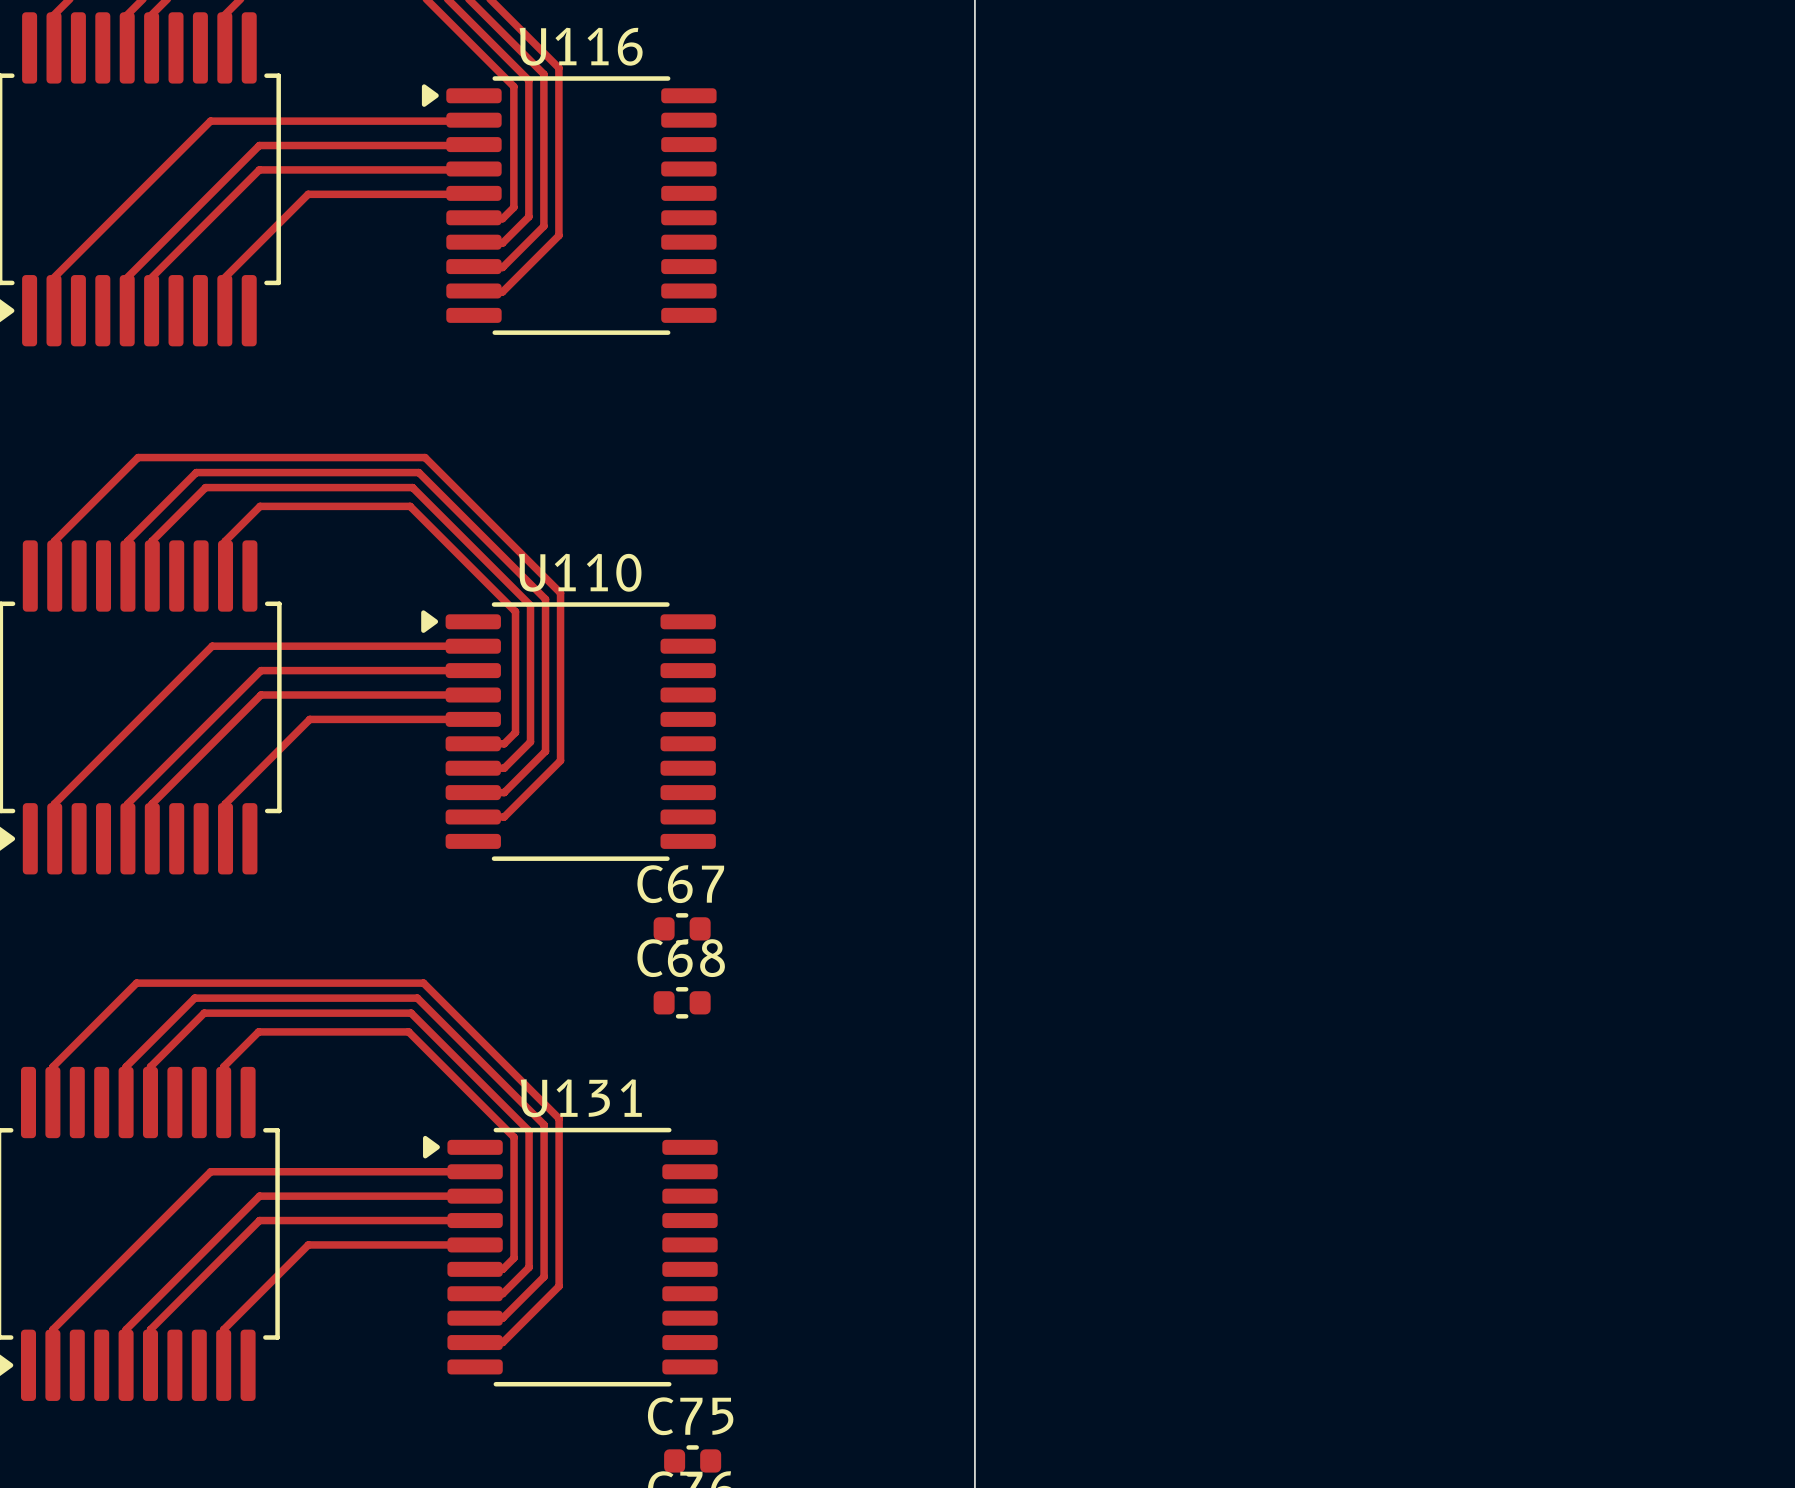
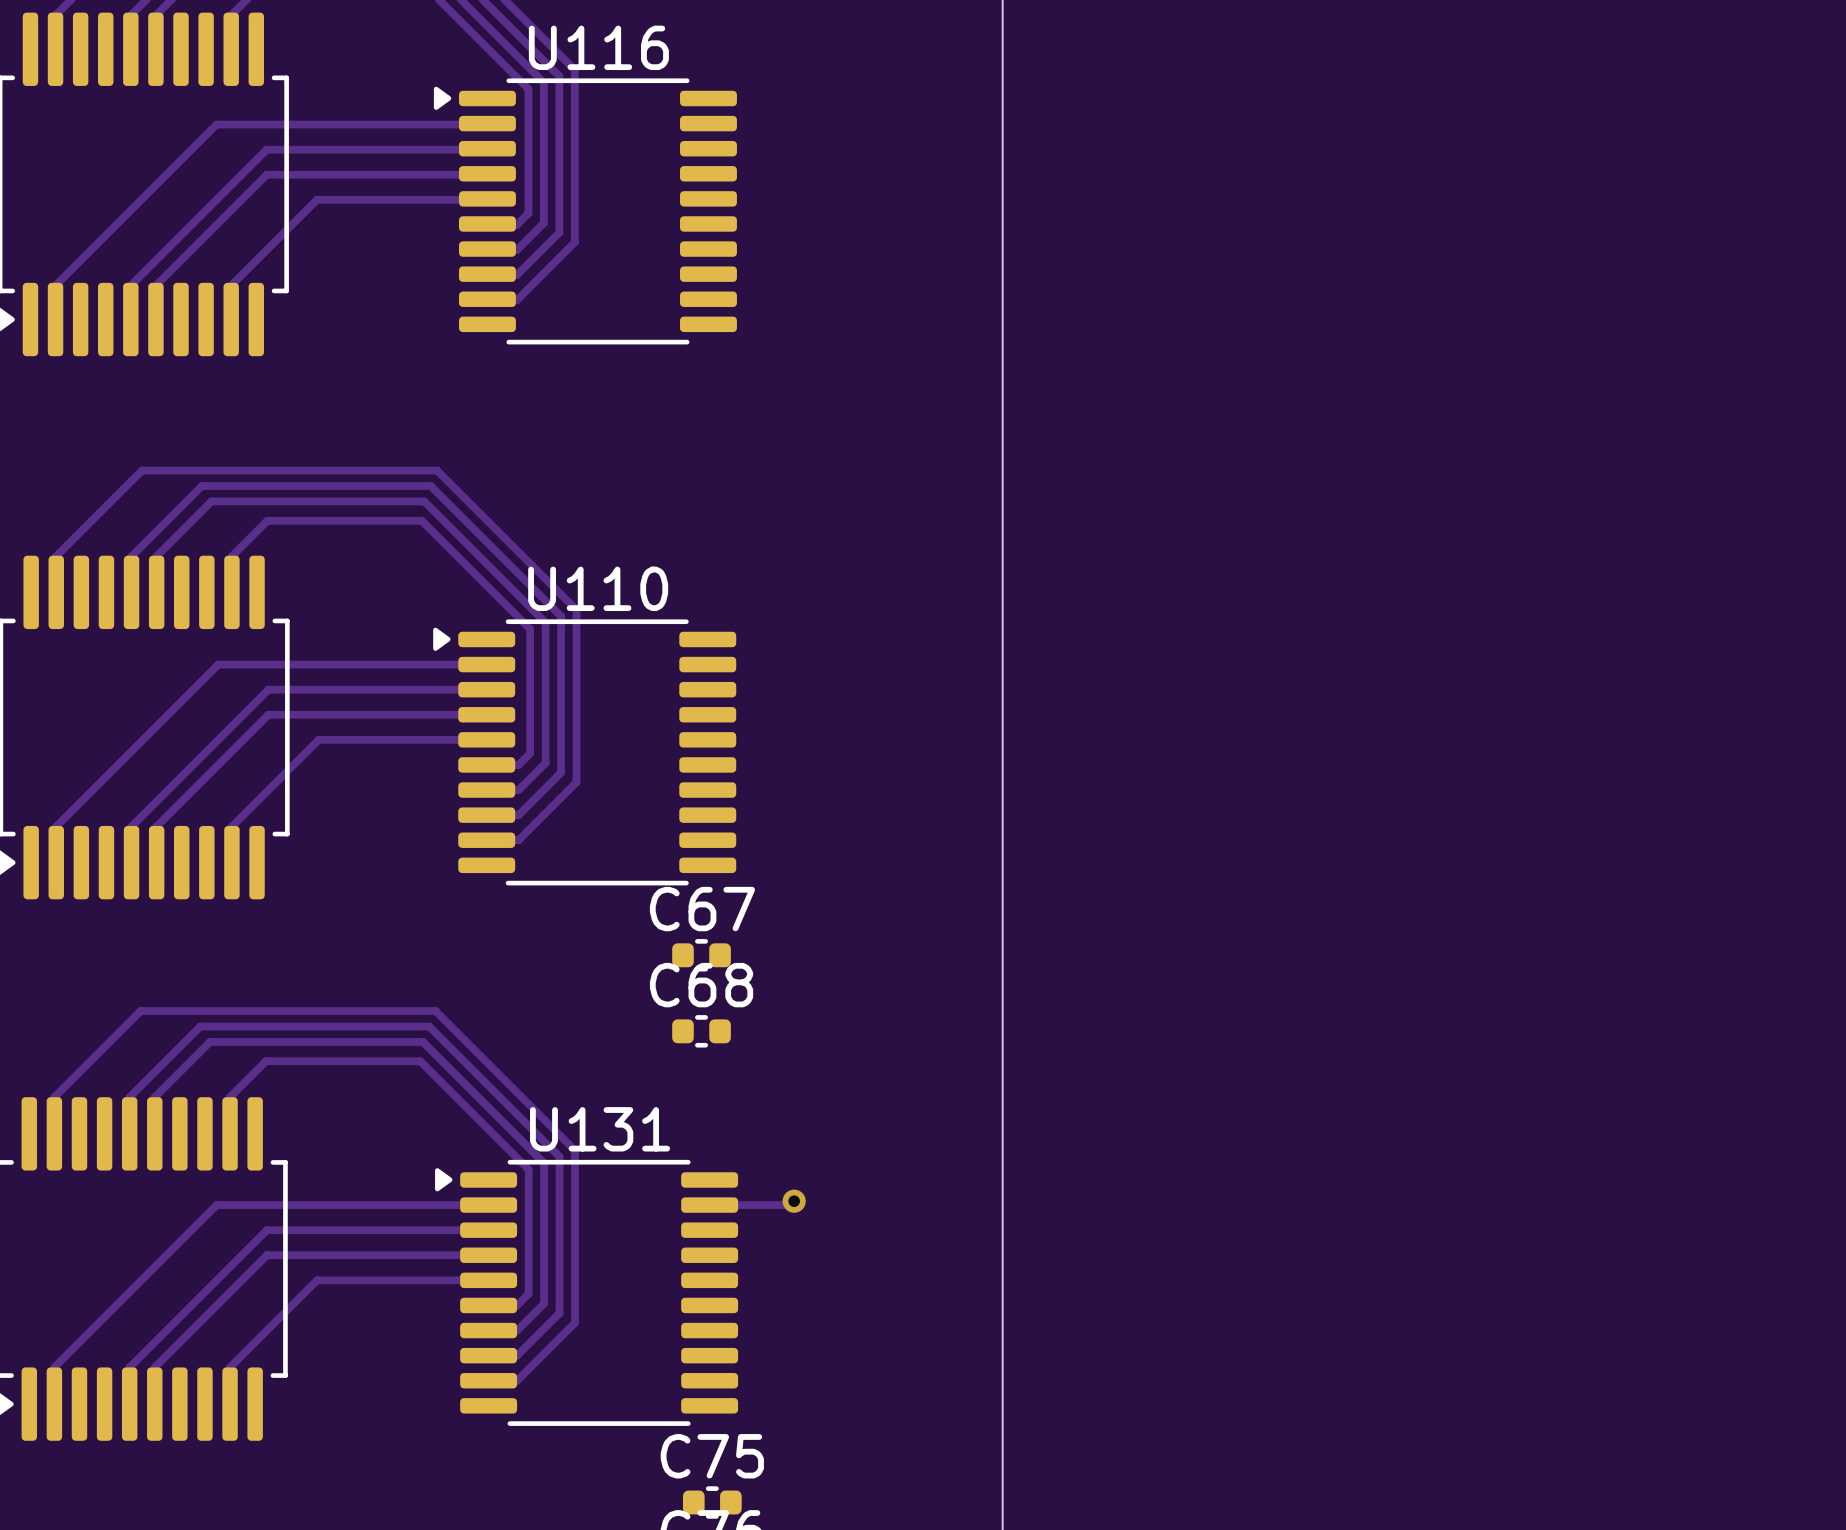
track: none -> (794, 1201) (790, 1205) (709, 1205)
via: none -> (794, 1201)

